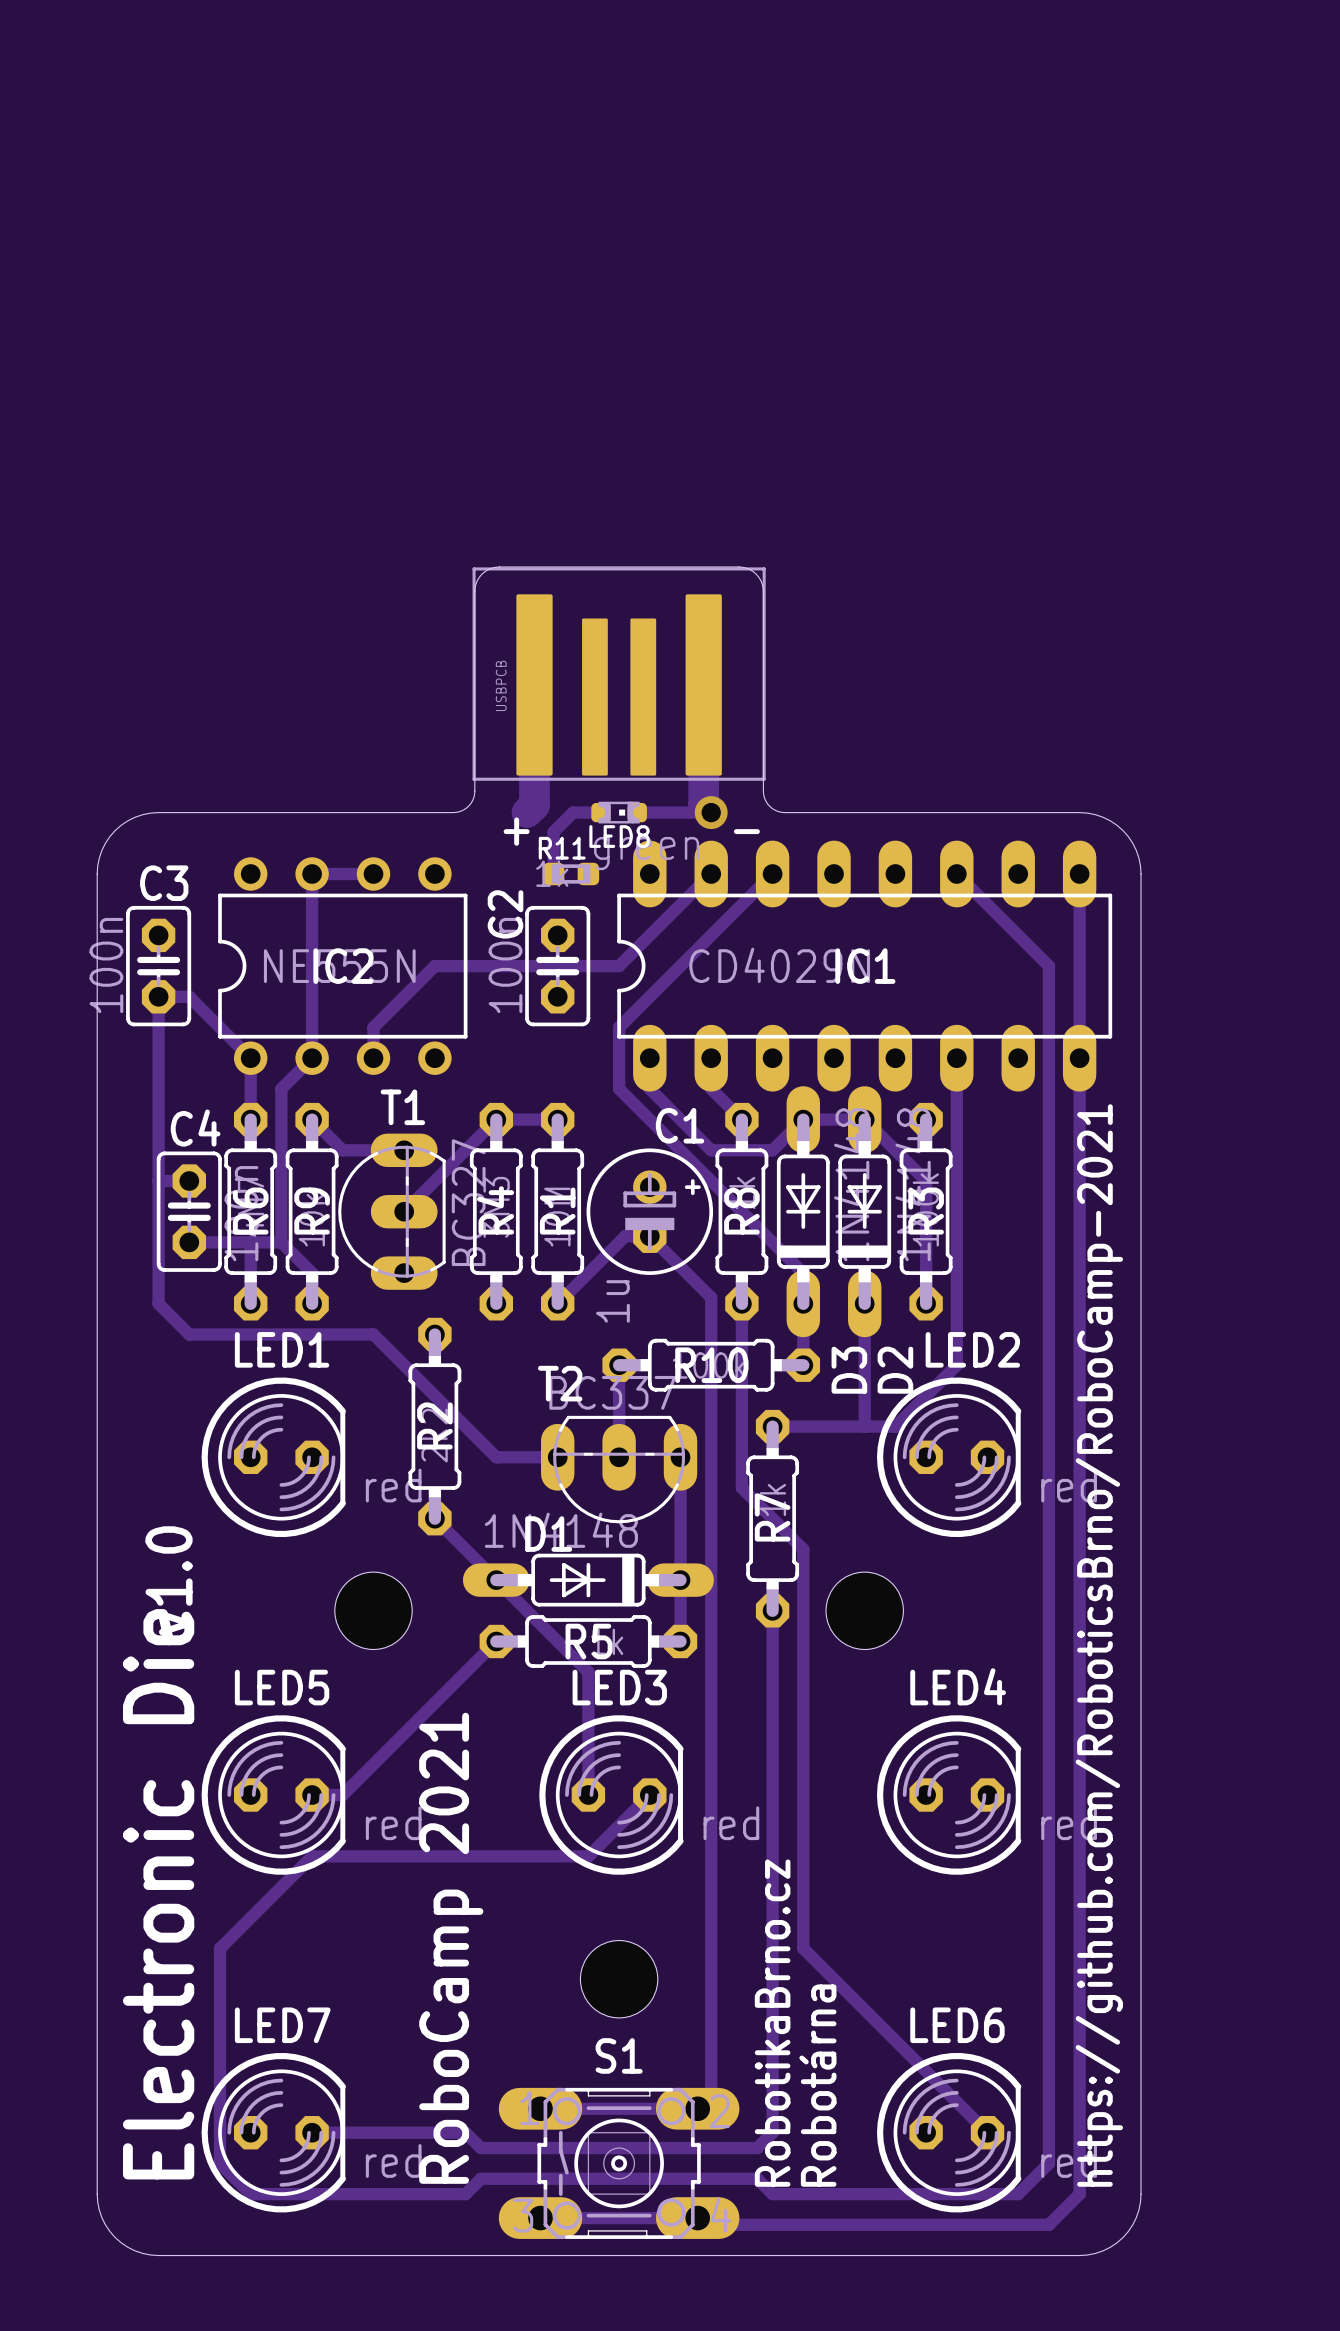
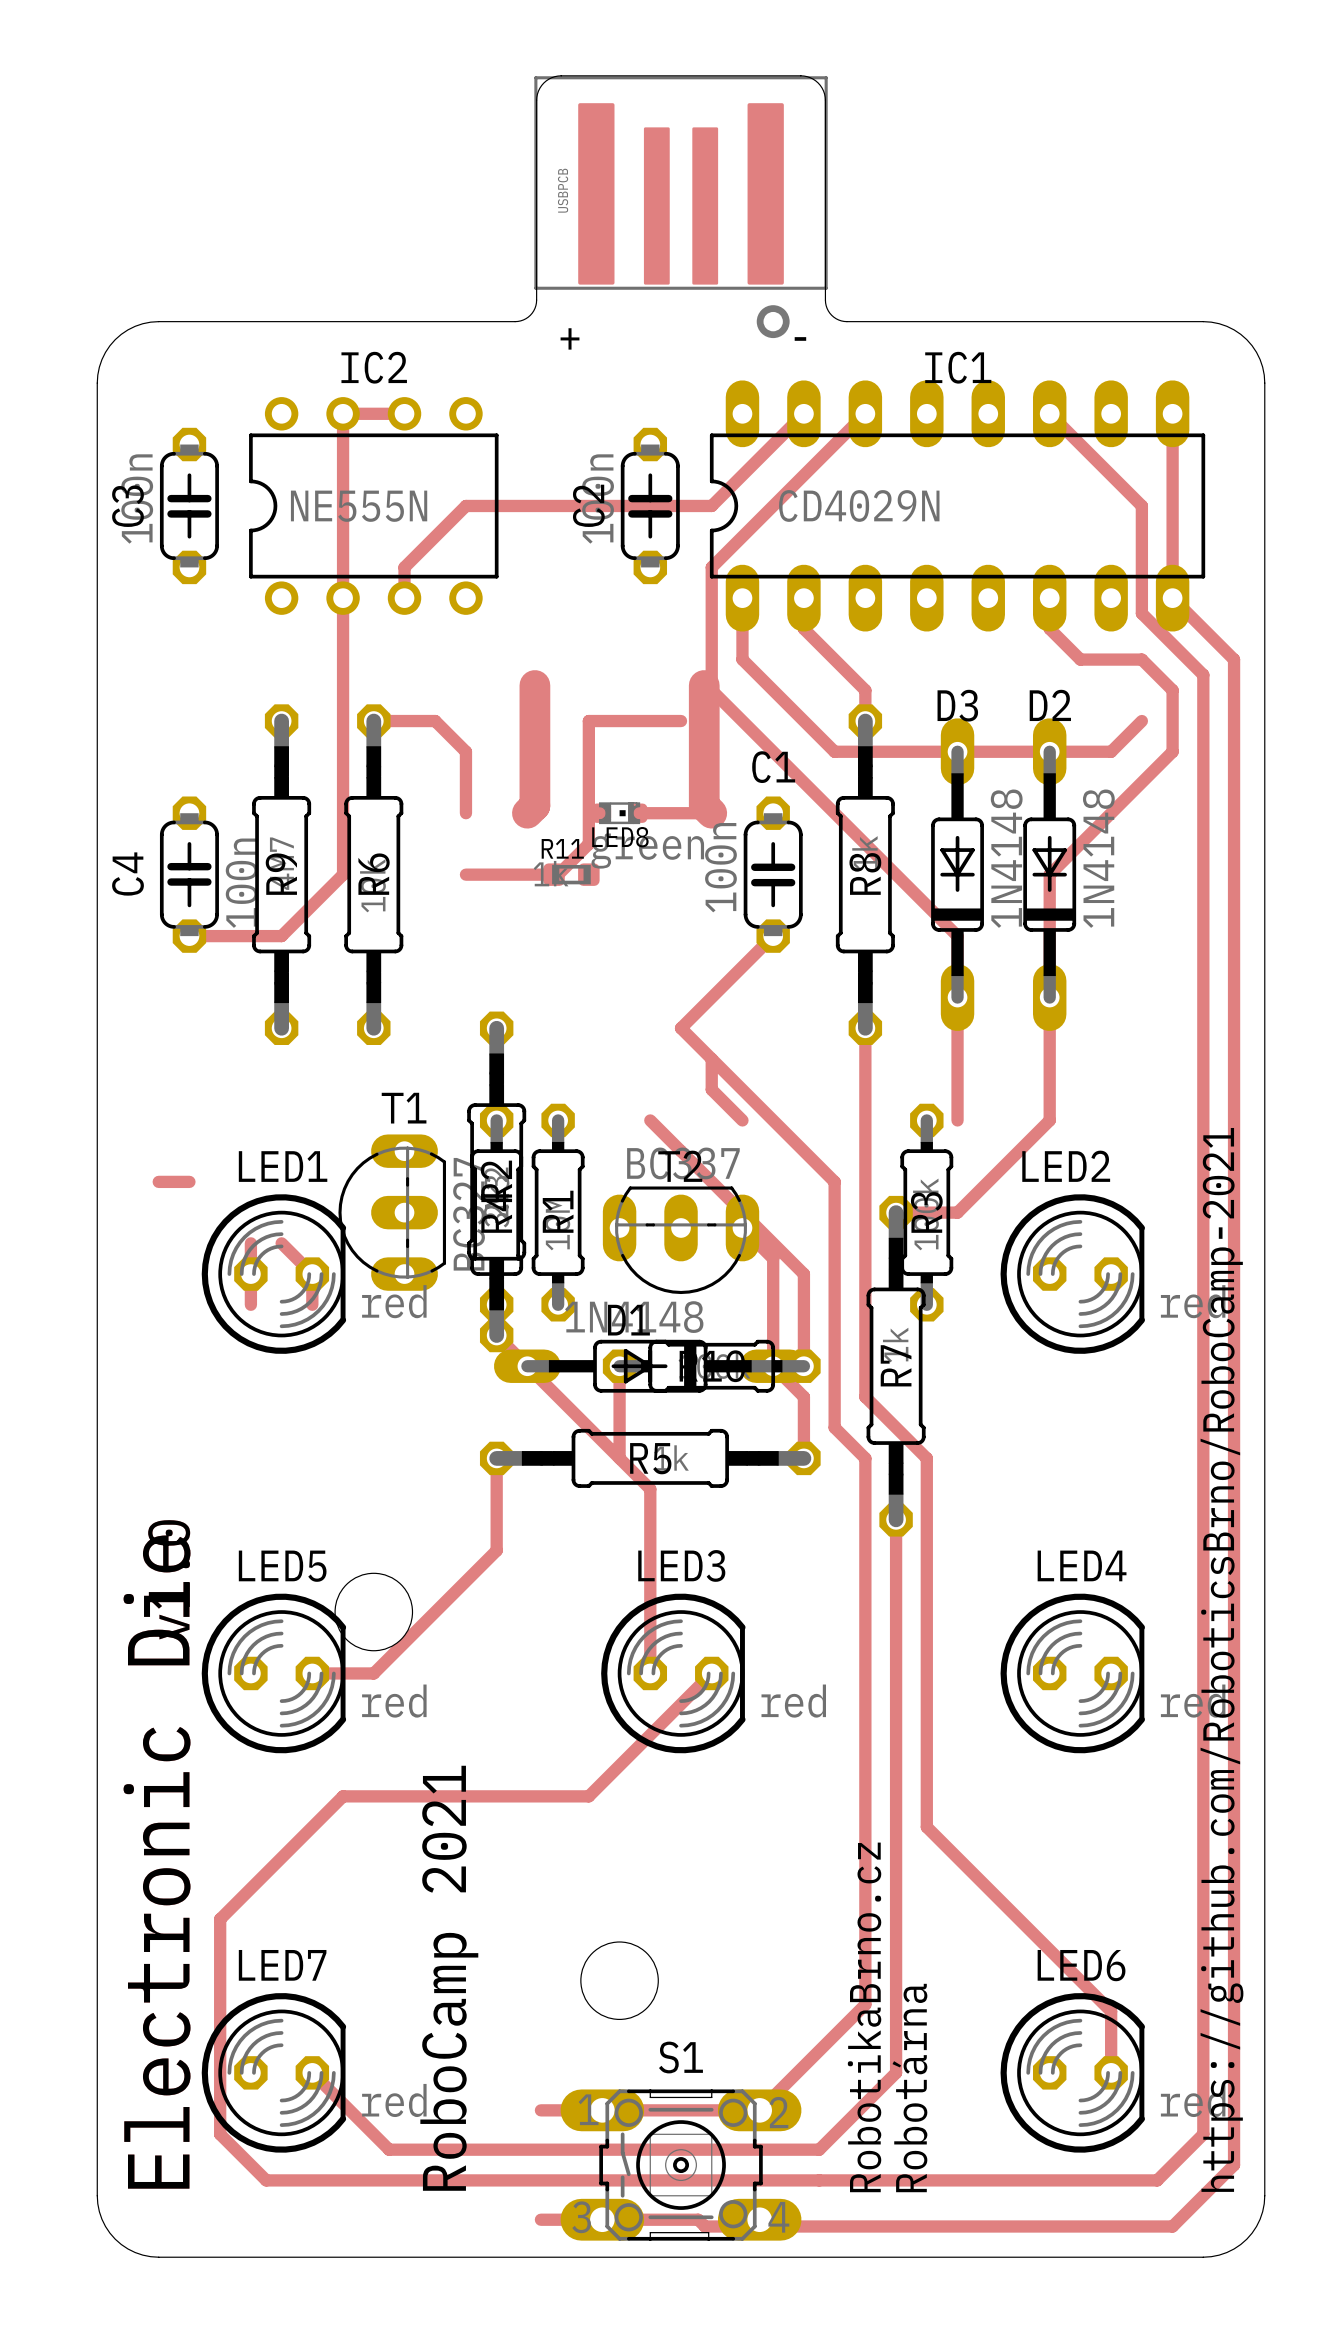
via: none -> (773, 321)
track: none -> (404, 413) (343, 413) (343, 874) (281, 936) (189, 936)
track: none -> (803, 413) (711, 505) (465, 505) (404, 567) (404, 598)
track: none -> (865, 413) (711, 567) (711, 690) (957, 936) (957, 1059)
track: none -> (742, 598) (742, 659) (834, 751) (1111, 751) (1141, 721)
track: none -> (803, 598) (803, 628) (865, 690) (865, 721)
part position: (619, 674) -> (681, 183)
track: none -> (373, 721) (435, 721) (465, 751) (465, 813)
track: none -> (681, 721) (588, 721) (588, 843) (558, 874) (465, 874)
track: (600, 812) (573, 812) (553, 832) (553, 874) -> none
via: (711, 812) -> none
text position: + (516, 831) -> + (570, 338)
text position: - (746, 831) -> - (800, 338)
board edge: (97, 874) (101, 850) (115, 830) (135, 817) (150, 813) (453, 812) (466, 808) (471, 801) (474, 791) (475, 588) (482, 574) (489, 568) (499, 566) (738, 566) (748, 568) (756, 574) (761, 582) (763, 591) (763, 793) (767, 804) (776, 810) (784, 812) (1087, 813) (1110, 820) (1128, 836) (1138, 858) (1141, 874) (1141, 2194) (1136, 2217) (1123, 2237) (1103, 2250) (1079, 2255) -> (97, 874) (97, 383) (99, 367) (105, 352) (121, 334) (135, 326) (150, 322) (515, 321) (525, 318) (533, 310) (536, 300) (536, 97) (541, 85) (551, 77) (561, 75) (800, 75) (815, 80) (823, 91) (825, 100) (825, 302) (829, 313) (838, 319) (846, 321) (1203, 321) (1226, 326) (1240, 334) (1252, 345) (1262, 367) (1264, 383) (1264, 2203) (1260, 2219) (1246, 2239) (1234, 2248) (1219, 2255) (1203, 2257) (1080, 2257)
track: (373, 874) (312, 874) (312, 1058) (281, 1088) (281, 1242) (189, 1242) -> none
track: (711, 874) (619, 966) (434, 966) (373, 1027) (373, 1058) -> none
track: (772, 874) (619, 1027) (619, 1088) (649, 1119) -> none
track: (956, 874) (1048, 966) -> (1049, 598) (1049, 628) (1080, 659) (1141, 659) (1172, 690) (1172, 751) (1049, 874) (1049, 966)
track: (1079, 874) (1079, 2194) (1048, 2224) -> (1172, 413) (1172, 598) (1234, 659) (1234, 2165) (1172, 2226) (1049, 2226)
C3 name position: C3 (164, 883) -> C3 (128, 506)
C3 footprint: [126, 905, 192, 1027] -> [159, 427, 219, 585]
C2 footprint: [525, 905, 591, 1027] -> [620, 427, 680, 585]
C2 name position: C2 (505, 914) -> C2 (588, 505)
IC2 position: (342, 966) -> (373, 505)
IC2 name position: IC2 (343, 966) -> IC2 (374, 367)
IC1 position: (864, 966) -> (957, 505)
IC1 name position: IC1 (865, 966) -> IC1 (958, 367)
track: none -> (865, 1028) (865, 1304)
track: (649, 1058) (649, 1088) (711, 1150) (772, 1150) (803, 1119) (864, 1119) (926, 1181) (926, 1303) -> none
D3 footprint: [776, 1086, 830, 1338] -> [931, 718, 984, 1031]
D2 footprint: [838, 1086, 892, 1338] -> [1023, 718, 1077, 1031]
R9 footprint: [224, 1102, 278, 1321] -> [252, 704, 312, 1045]
R6 footprint: [285, 1102, 339, 1321] -> [344, 704, 404, 1045]
R8 footprint: [715, 1102, 769, 1321] -> [835, 704, 895, 1045]
track: (250, 1119) (250, 1058) (189, 996) (158, 996) (158, 1303) (189, 1334) (373, 1334) (496, 1457) (557, 1457) -> none
track: (312, 1119) (342, 1150) (404, 1150) -> none
track: (557, 1119) (496, 1119) (404, 1211) -> none
track: (956, 1119) (956, 1365) (895, 1426) (772, 1426) -> none
track: (1048, 1119) (1048, 2163) (1018, 2194) (772, 2194) (757, 2178) -> (1049, 413) (1141, 505) (1141, 613) (1203, 674) (1203, 2134) (1157, 2180) (757, 2180)
track: none -> (1049, 1120) (957, 1212) (896, 1212)
C4 name position: C4 (195, 1128) -> C4 (128, 874)
C1 footprint: [586, 1148, 714, 1275] -> [743, 796, 803, 953]
C4 footprint: [156, 1151, 222, 1272] -> [159, 796, 219, 953]
R6 name position: R6 (250, 1211) -> R6 (374, 874)
R9 name position: R9 (312, 1211) -> R9 (281, 874)
track: none -> (742, 1227) (773, 1258) (773, 1366) (803, 1396) (803, 1458)
C1 value: 1u (612, 1301) -> 100n (720, 867)
track: (557, 1303) (625, 1236) (649, 1236) (711, 1297) (711, 2095) (697, 2108) -> (773, 936) (681, 1028) (834, 1181) (834, 1427) (865, 1458) (865, 2004) (759, 2110) (698, 2110)
track: (741, 1303) (741, 1488) (803, 1549) (803, 1948) (987, 2132) -> none
R2 footprint: [408, 1317, 462, 1536] -> [467, 1011, 527, 1353]
track: none -> (496, 1335) (650, 1489) (650, 1673)
LED2 name position: LED2 (972, 1349) -> LED2 (1066, 1166)
D3 name position: D3 (849, 1370) -> D3 (957, 705)
D2 name position: D2 (895, 1370) -> D2 (1050, 705)
T2 name position: T2 (560, 1383) -> T2 (680, 1166)
track: (864, 1395) (864, 1426) -> (865, 1396) (926, 1458) (926, 1827) (1111, 2011) (1111, 2072)
R7 footprint: [746, 1409, 800, 1628] -> [866, 1195, 926, 1537]
LED1 position: (273, 1457) -> (273, 1274)
track: none -> (496, 1458) (496, 1550) (373, 1673) (312, 1673)
track: (680, 1457) (680, 1641) -> none
LED2 position: (949, 1457) -> (1072, 1274)
T2 position: (619, 1469) -> (681, 1240)
track: (434, 1518) (588, 1672) (588, 1795) -> none
D1 footprint: [462, 1553, 714, 1607] -> [493, 1339, 807, 1393]
track: (772, 1610) (772, 2132) (757, 2148) -> (896, 1519) (896, 2072) (819, 2149) (757, 2149)
hole: (864, 1610) -> none
R5 footprint: [479, 1615, 698, 1668] -> [479, 1428, 821, 1488]
track: (496, 1641) (342, 1795) (312, 1795) -> none
text position: https://github.com/RoboticsBrno/RoboCamp-2021 (1099, 1645) -> https://github.com/RoboticsBrno/RoboCamp-2021 (1221, 1659)
LED5 position: (273, 1795) -> (273, 1673)
LED3 position: (611, 1795) -> (673, 1673)
track: (649, 1795) (588, 1856) (312, 1856) (220, 1948) -> (711, 1673) (588, 1796) (343, 1796) (220, 1919) (220, 1949)
LED4 position: (949, 1795) -> (1072, 1673)
text position: RobotikaBrno.cz (772, 2023) -> RobotikaBrno.cz (864, 2017)
text position: Robotárna (817, 2085) -> Robotárna (909, 2088)
track: (220, 2132) (220, 2163) (250, 2194) (465, 2194) (480, 2178) -> (220, 2134) (266, 2180) (481, 2180)
LED7 position: (273, 2132) -> (273, 2072)
track: (312, 2132) (465, 2132) (480, 2148) -> (312, 2072) (389, 2149) (481, 2149)
LED6 position: (949, 2132) -> (1072, 2072)
S1 position: (619, 2163) -> (681, 2165)

